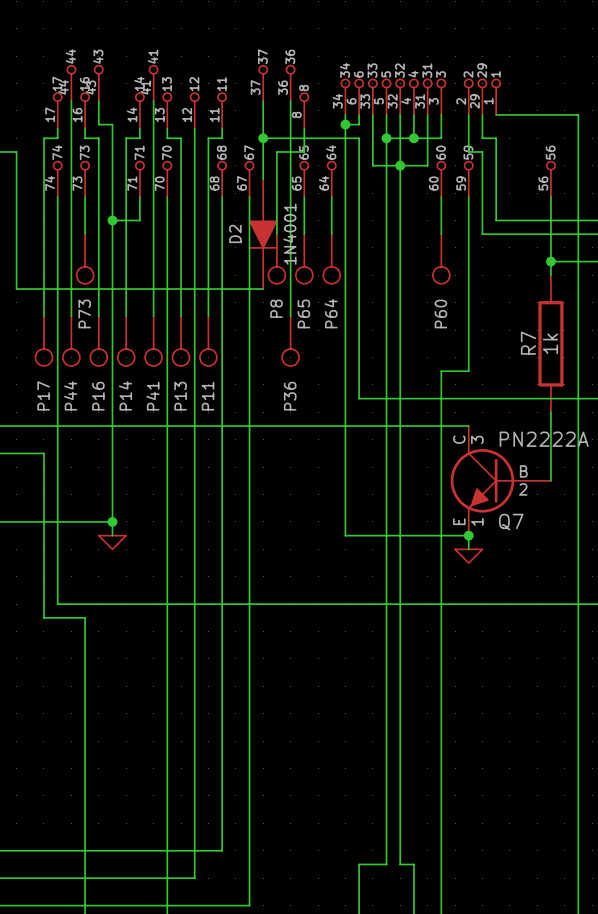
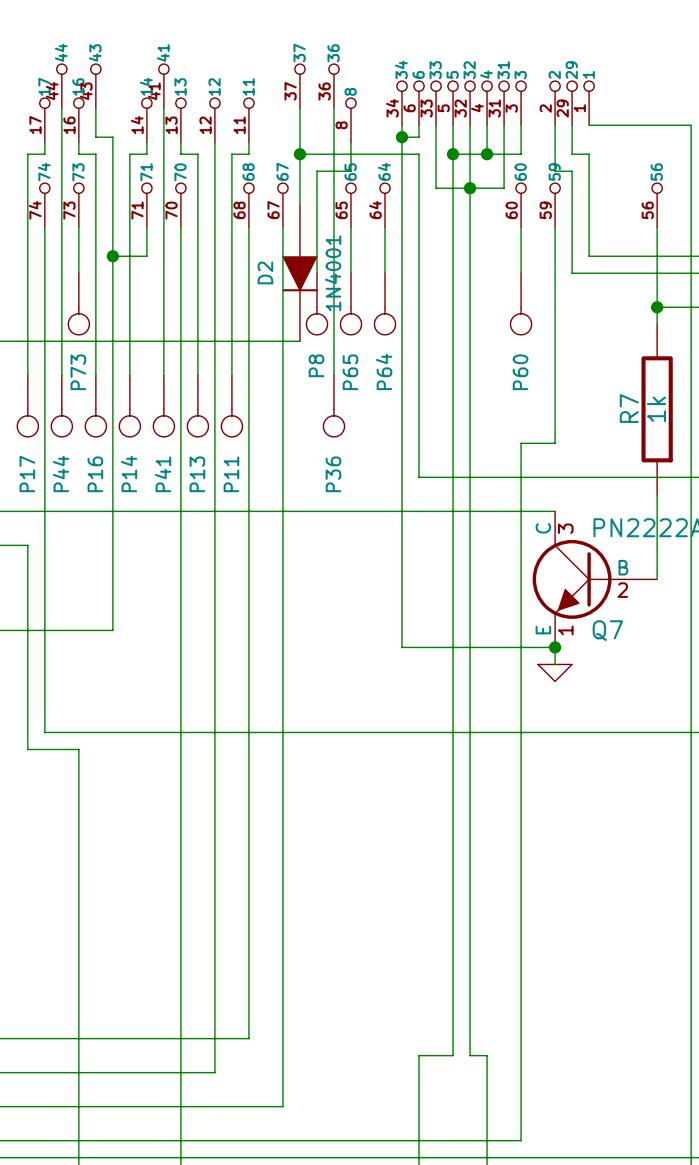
wire: (112, 521) (112, 535) -> none
junction: (112, 521) -> none
power symbol: (112, 542) -> none

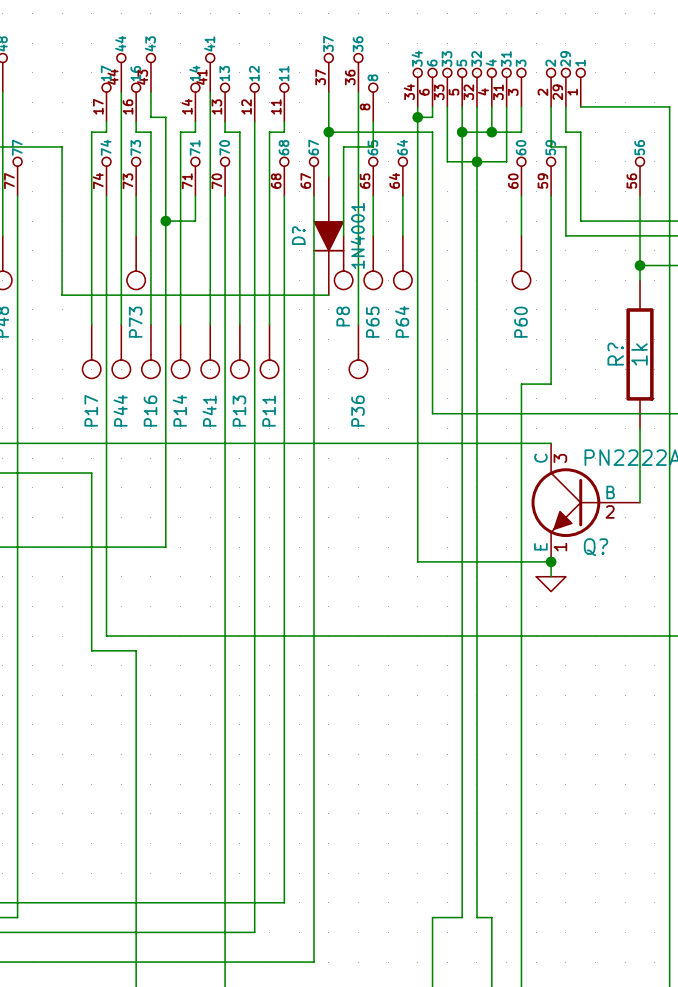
D2 name: D2 (265, 272) -> D? (298, 235)
R7 name: R7 (629, 408) -> R? (615, 354)
Q7 name: Q7 (607, 630) -> Q? (596, 547)

